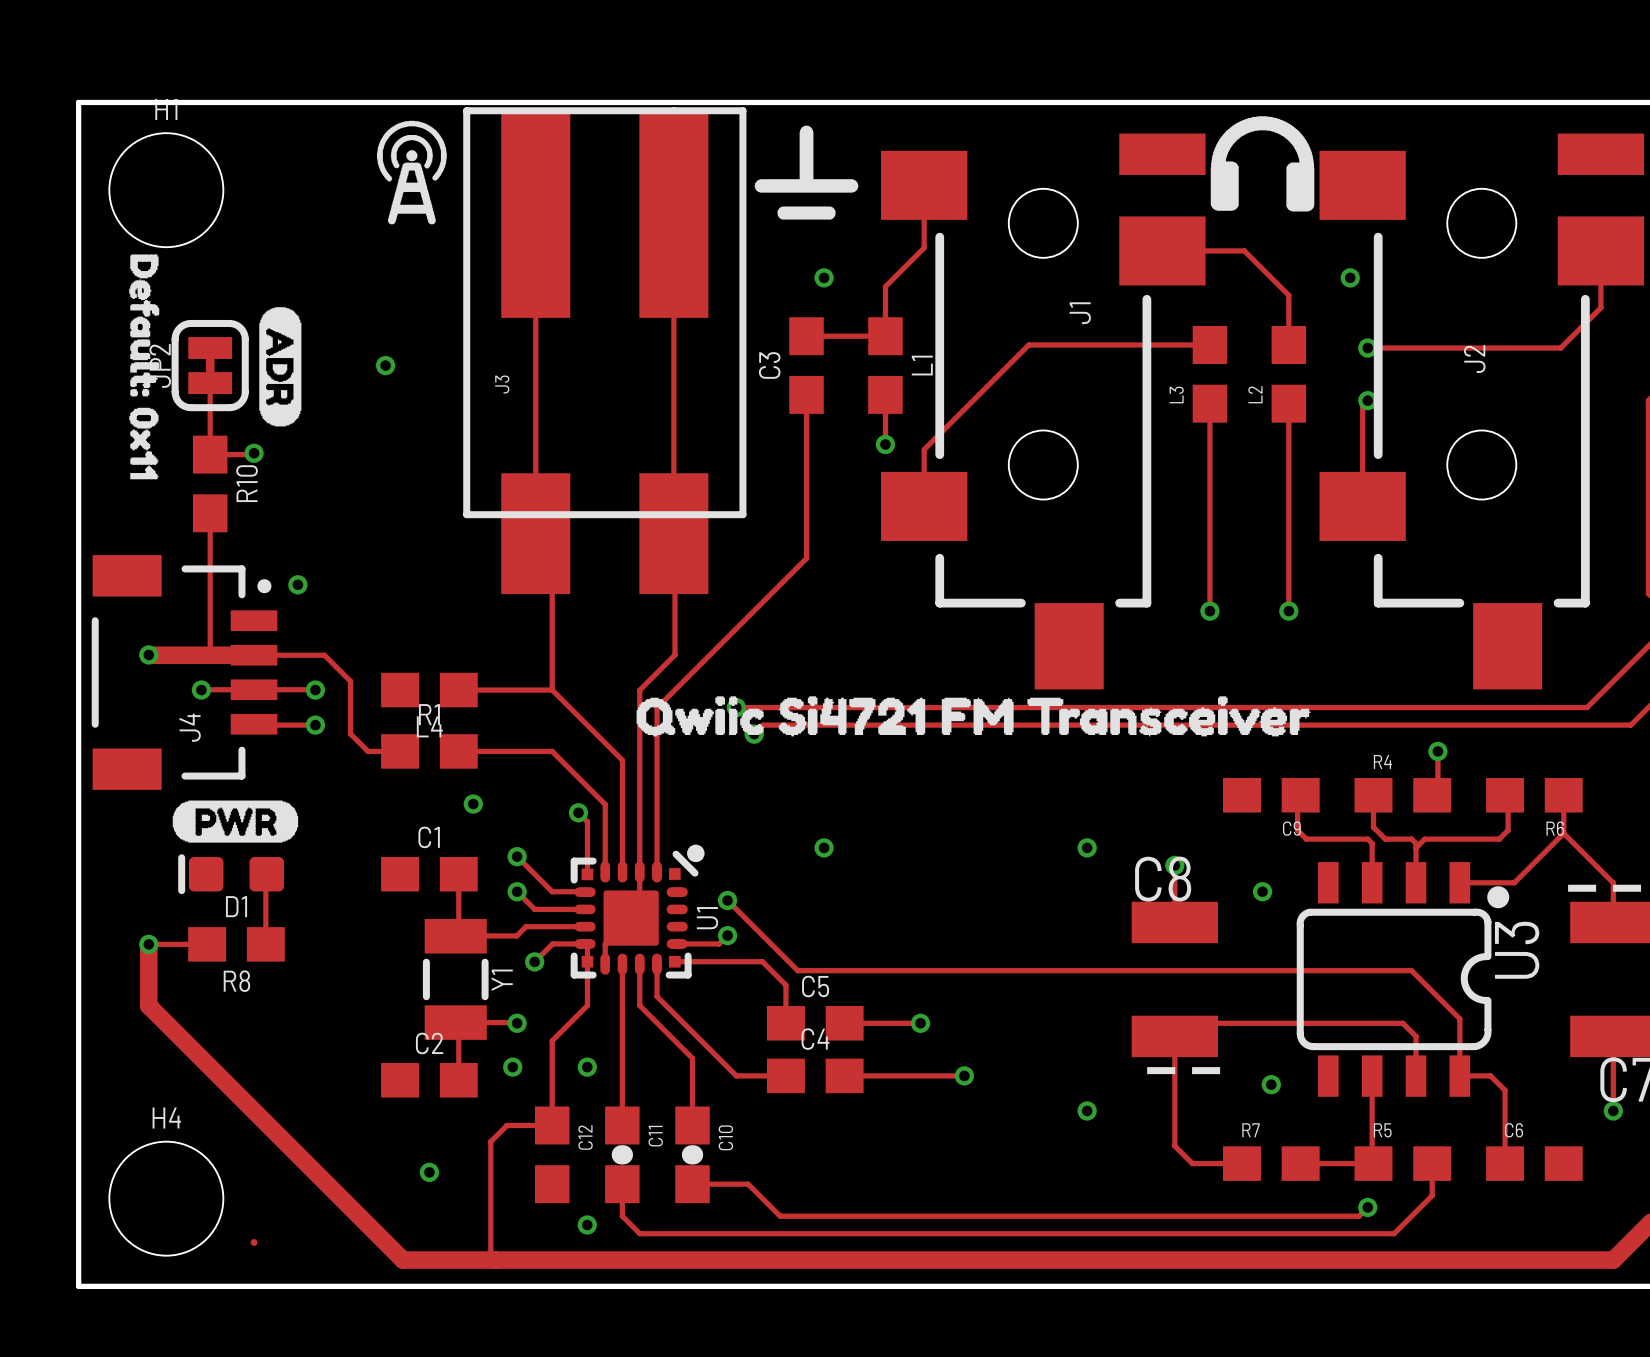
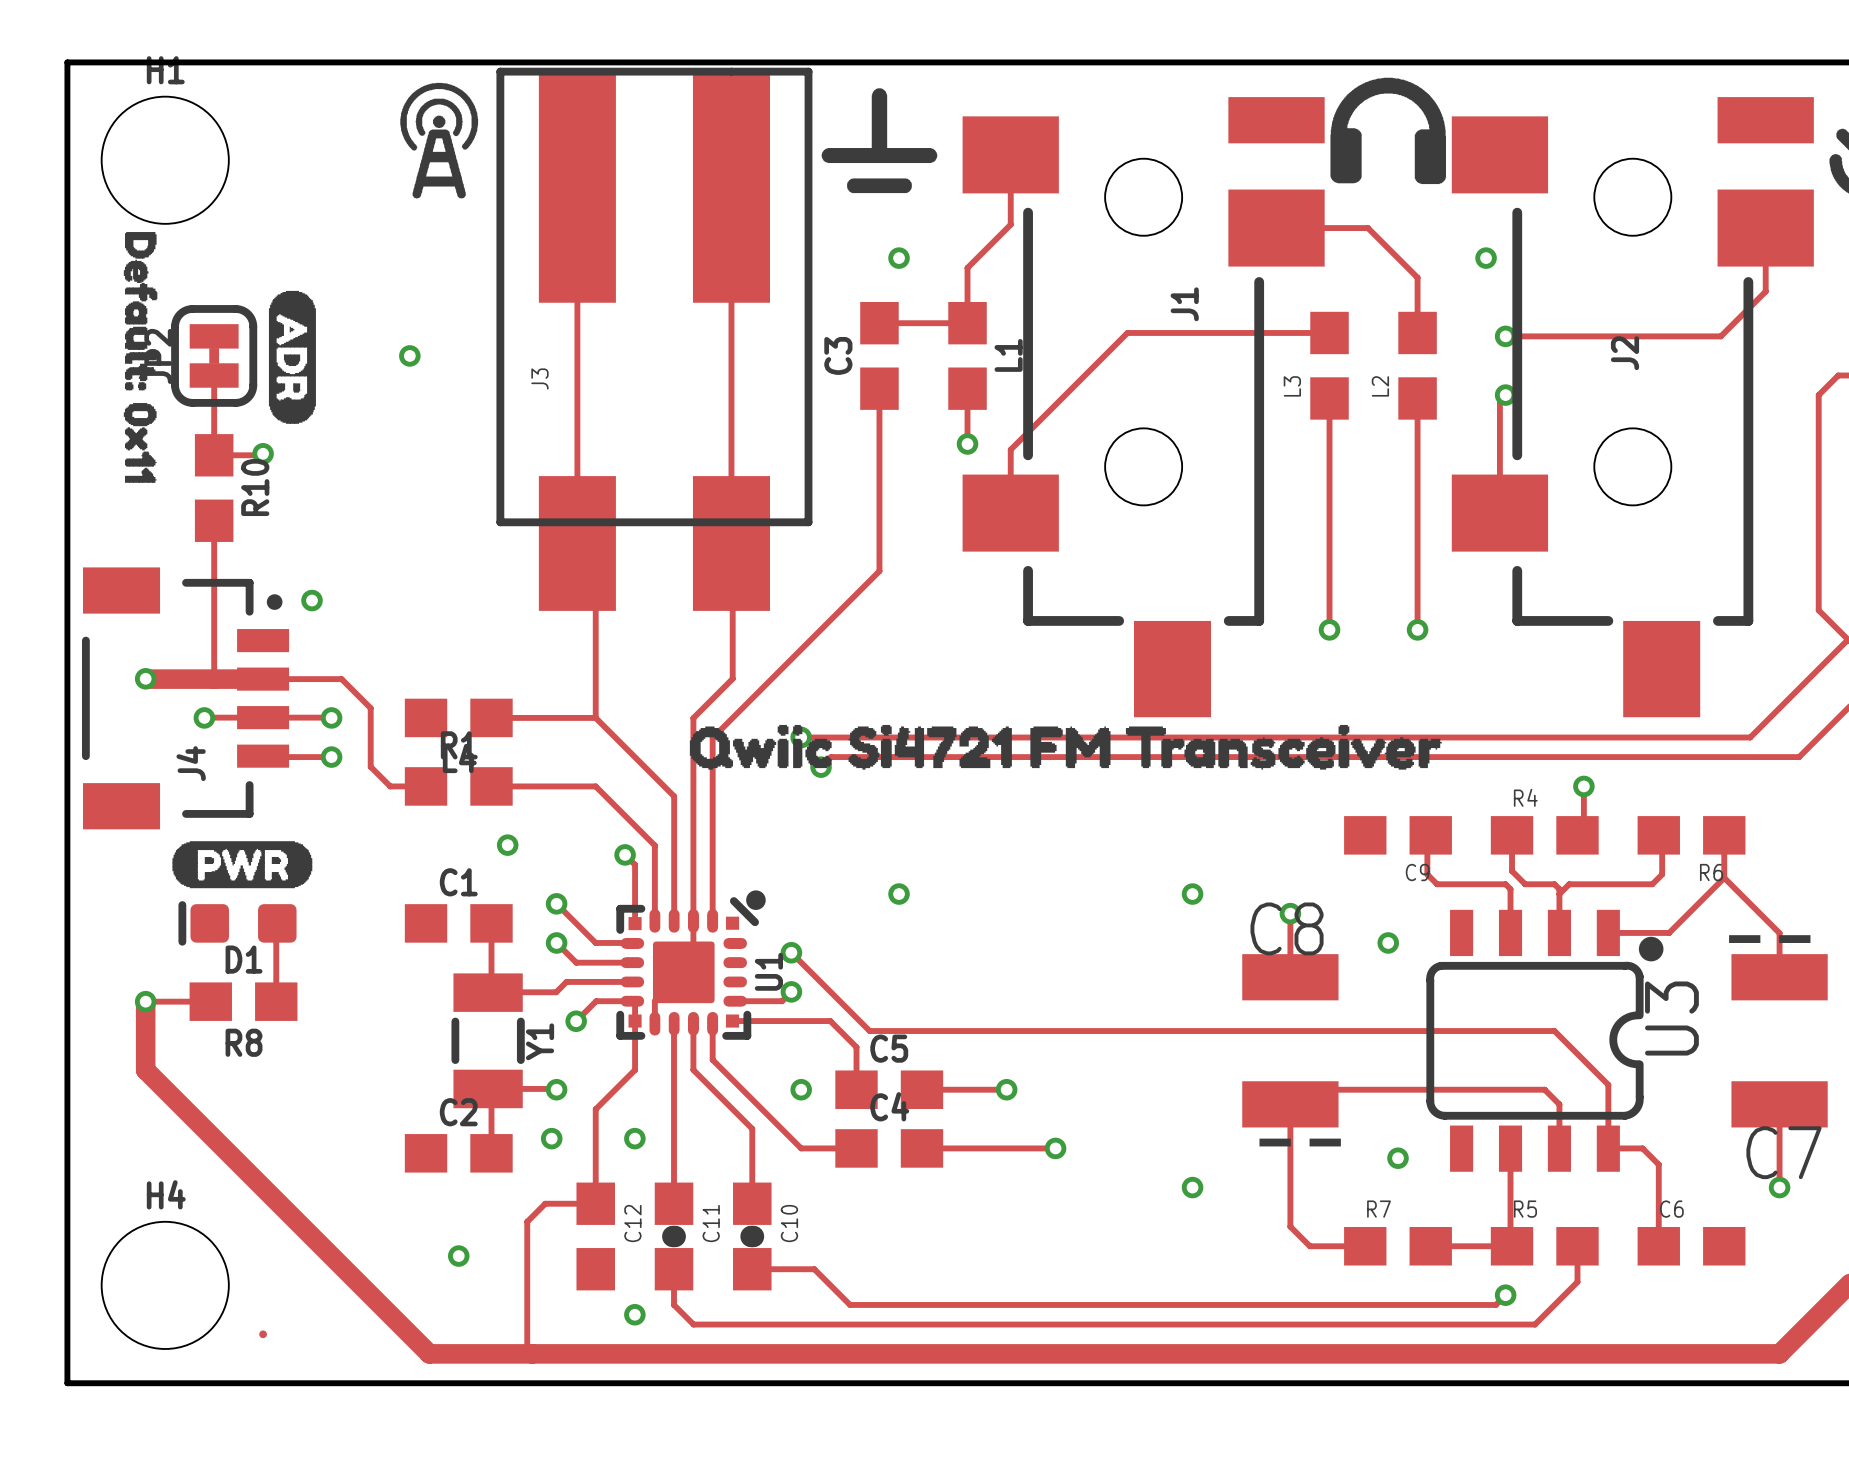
via: none -> (801, 1089)

